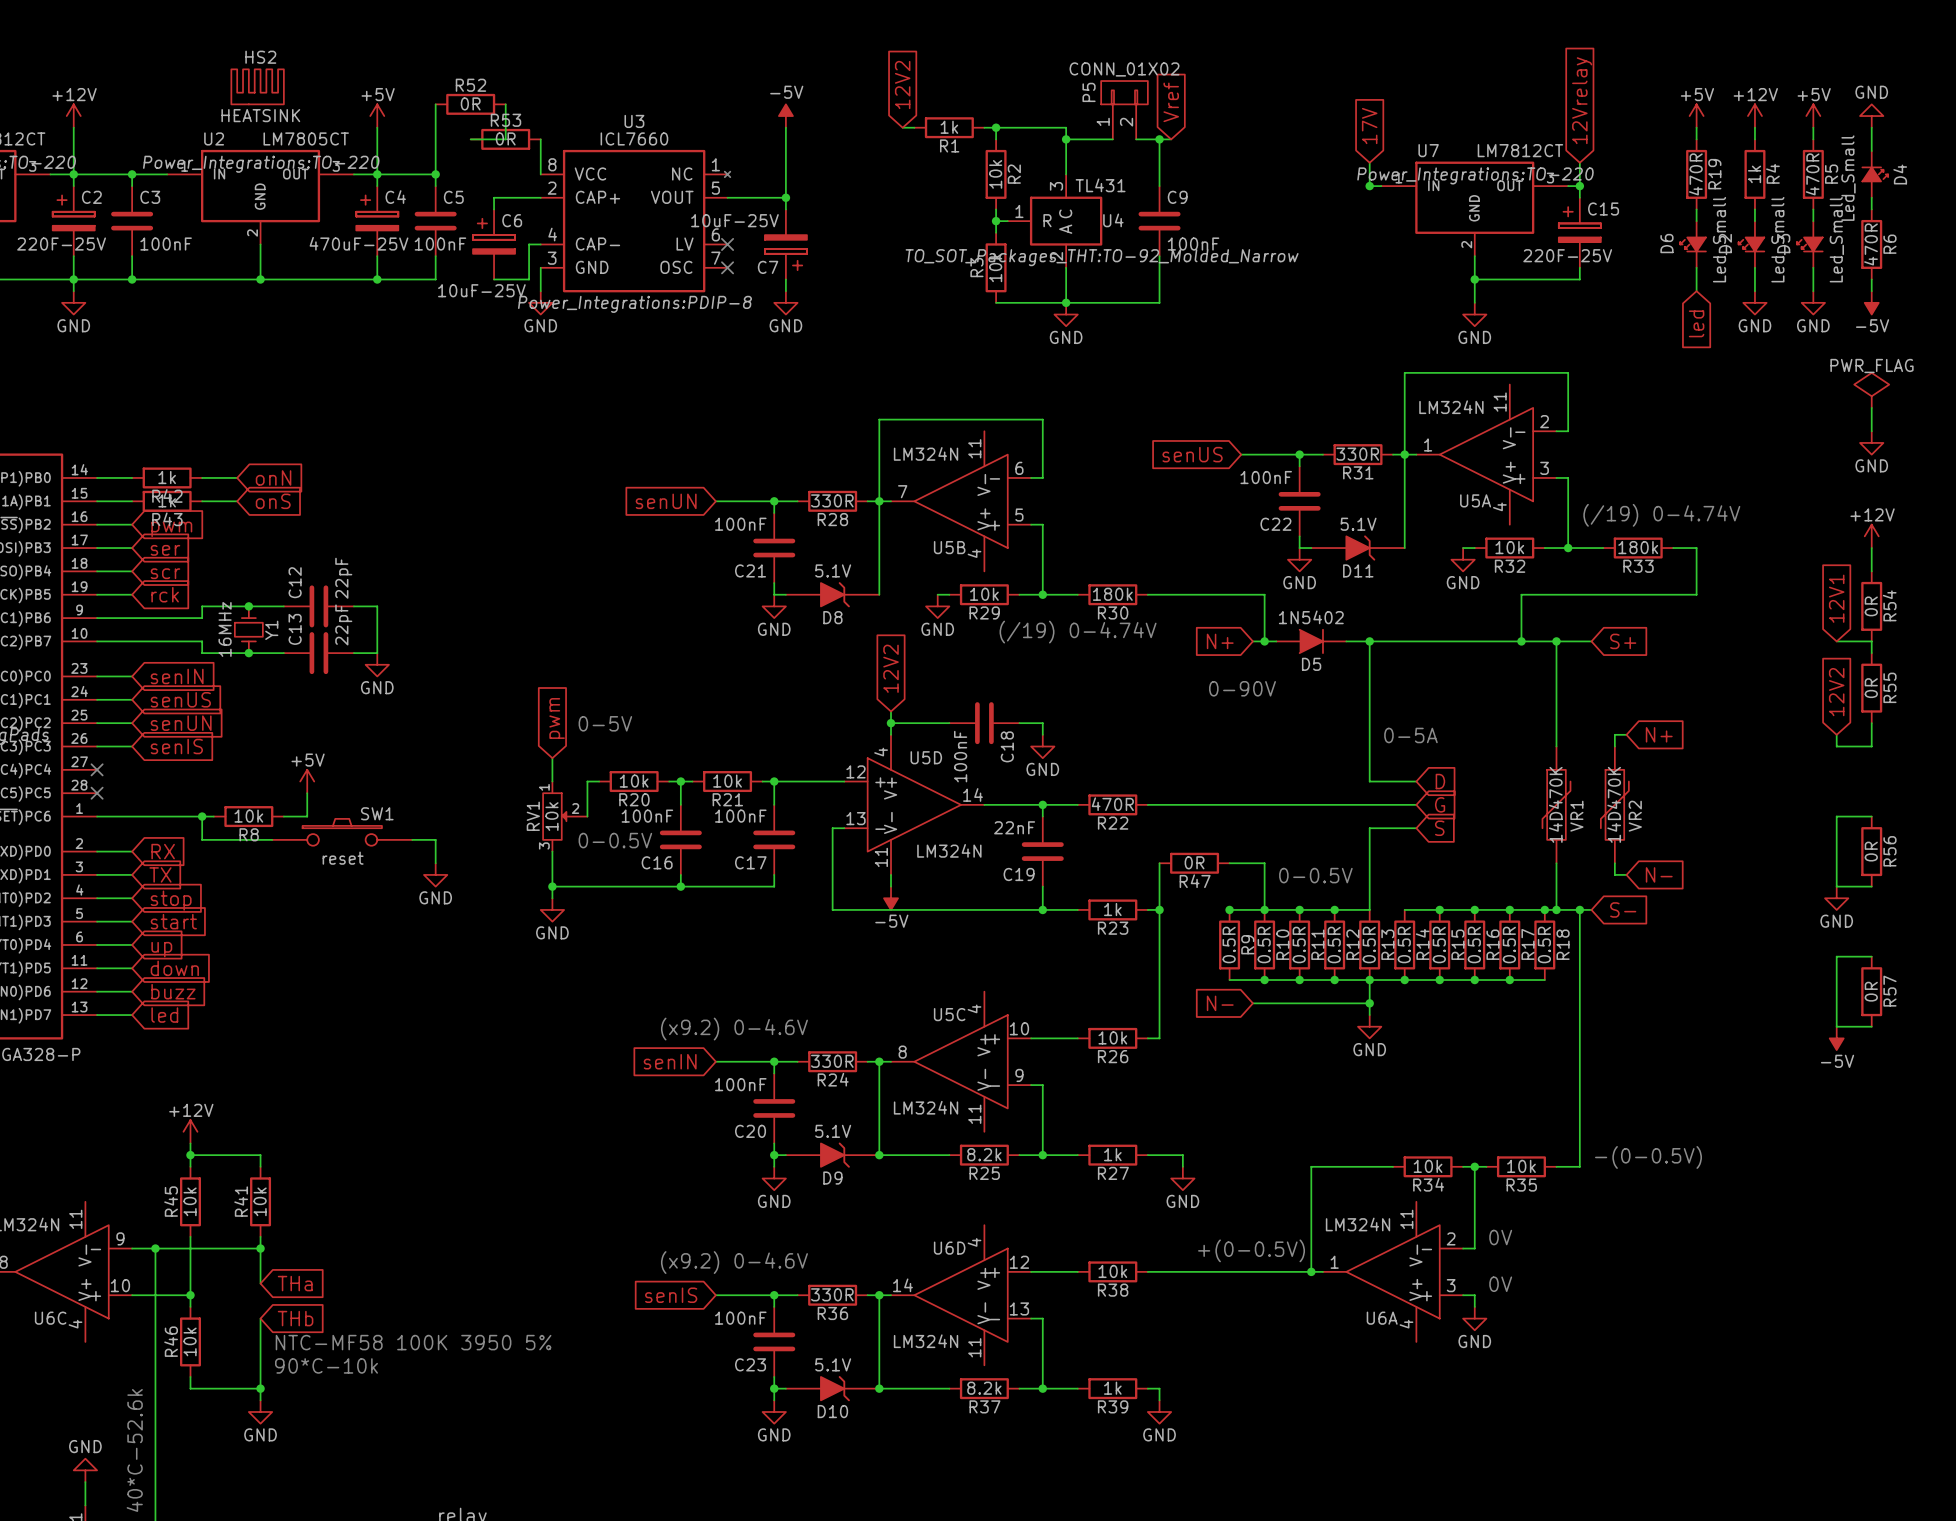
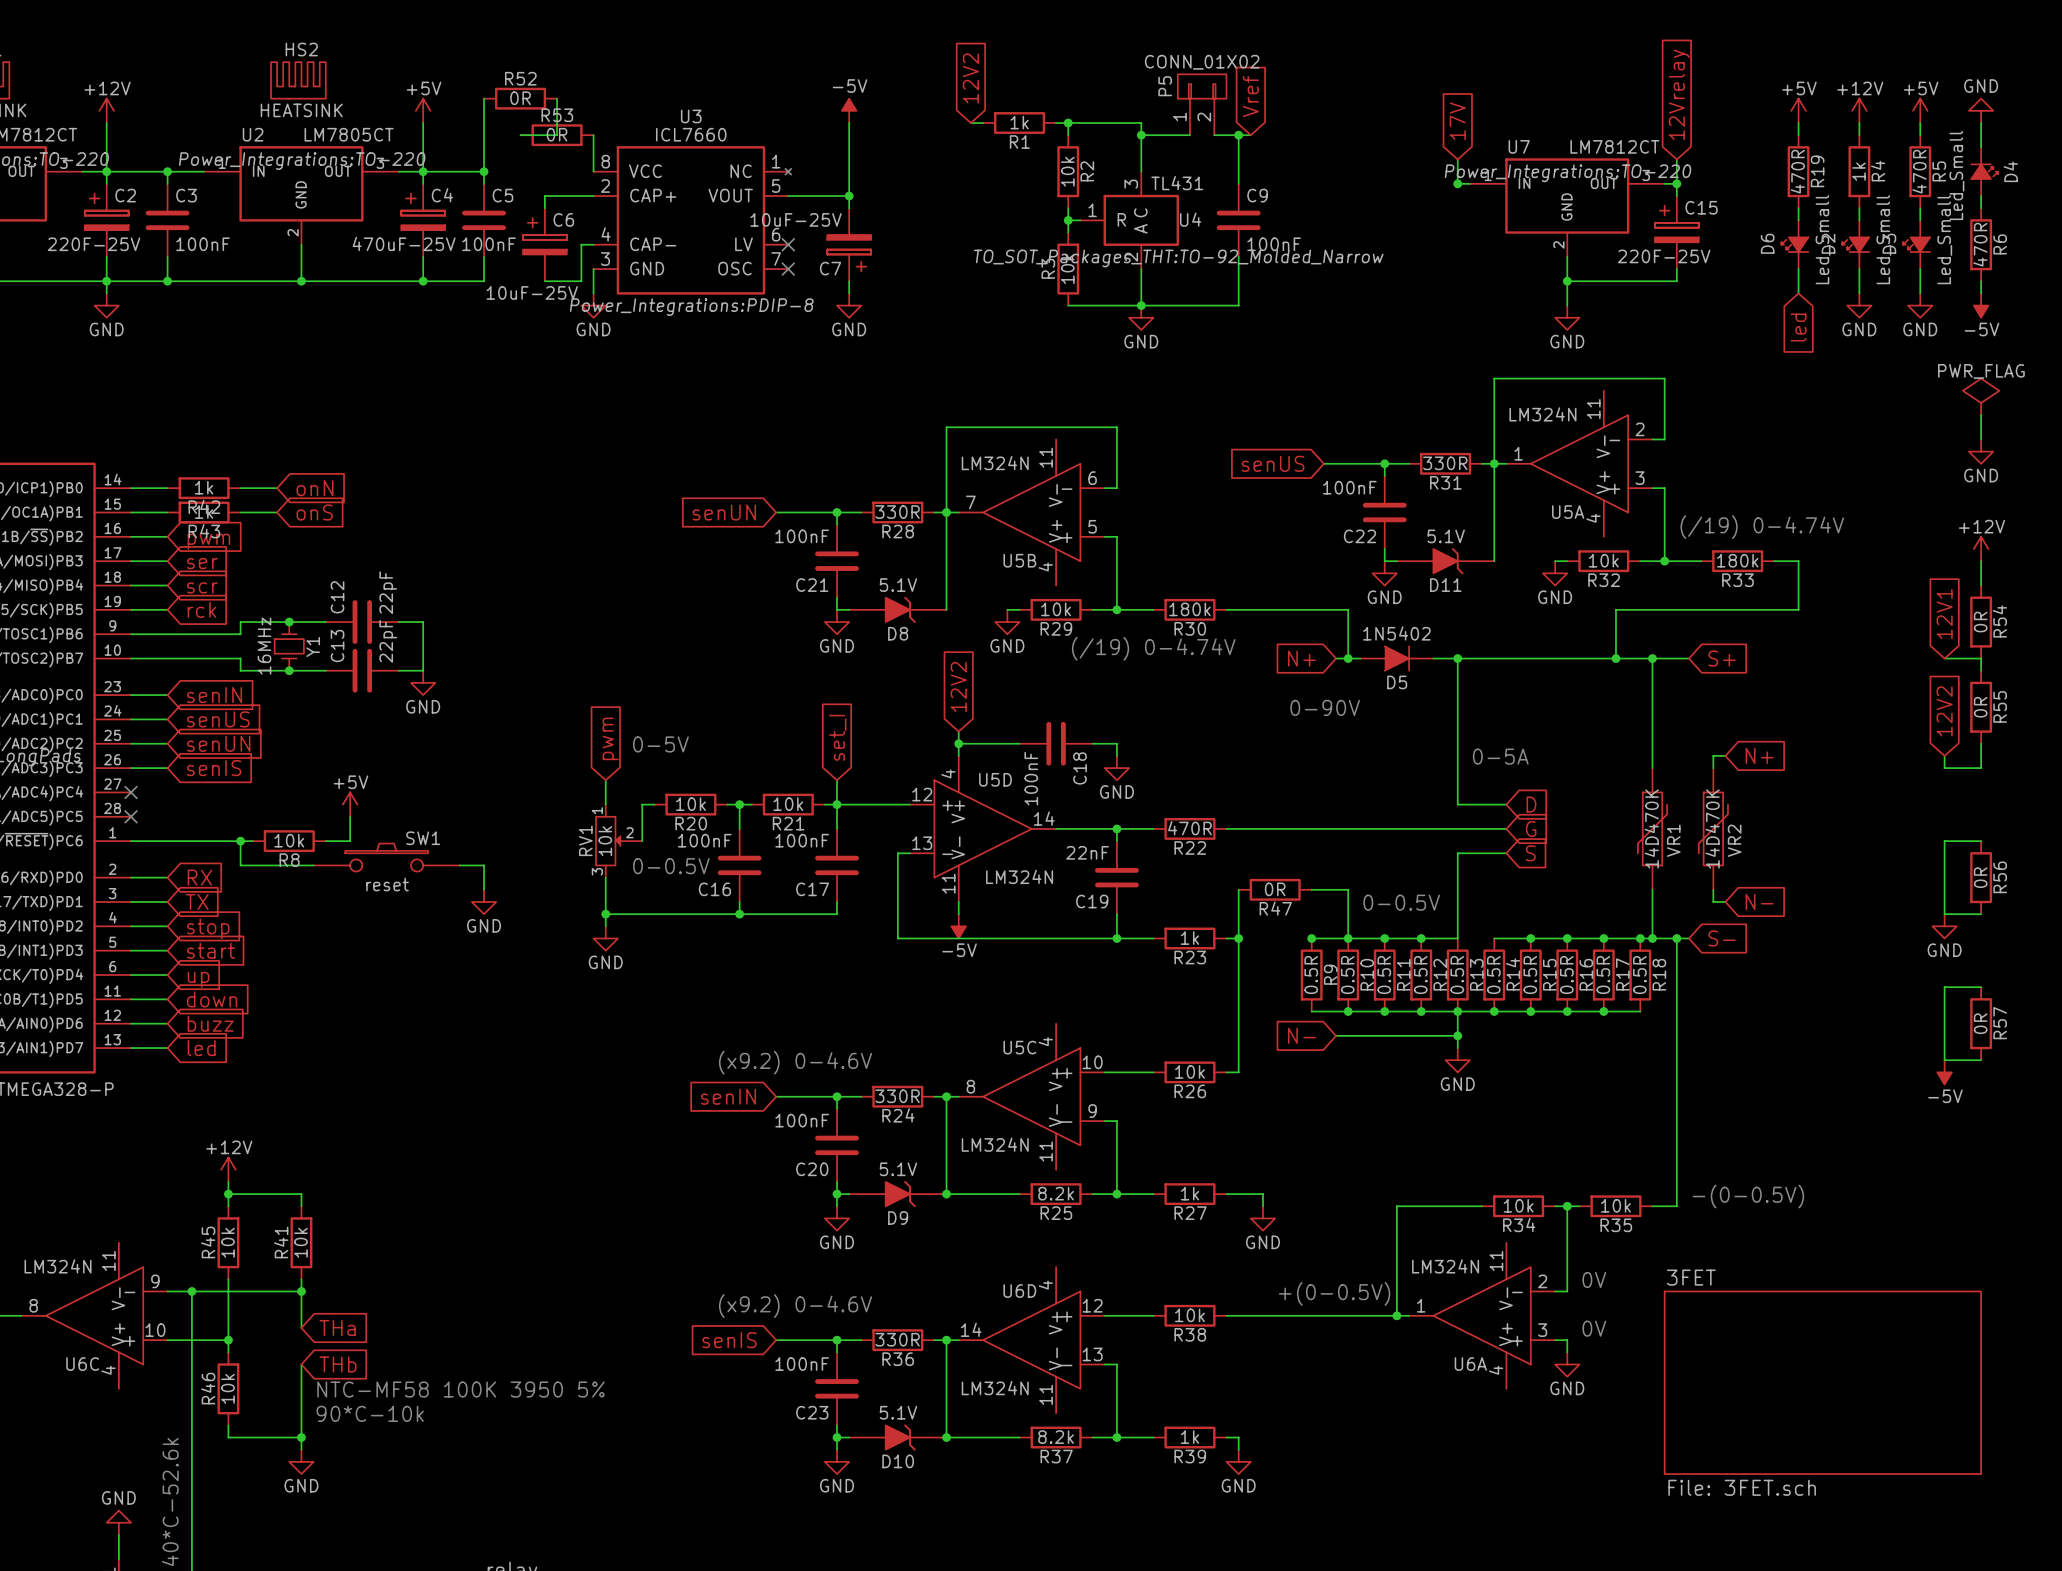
global label: none -> set_I (837, 737)
wire: none -> (837, 780) (837, 804)
sheet 3FET: none -> File: 3FET.sch (1822, 1382)

